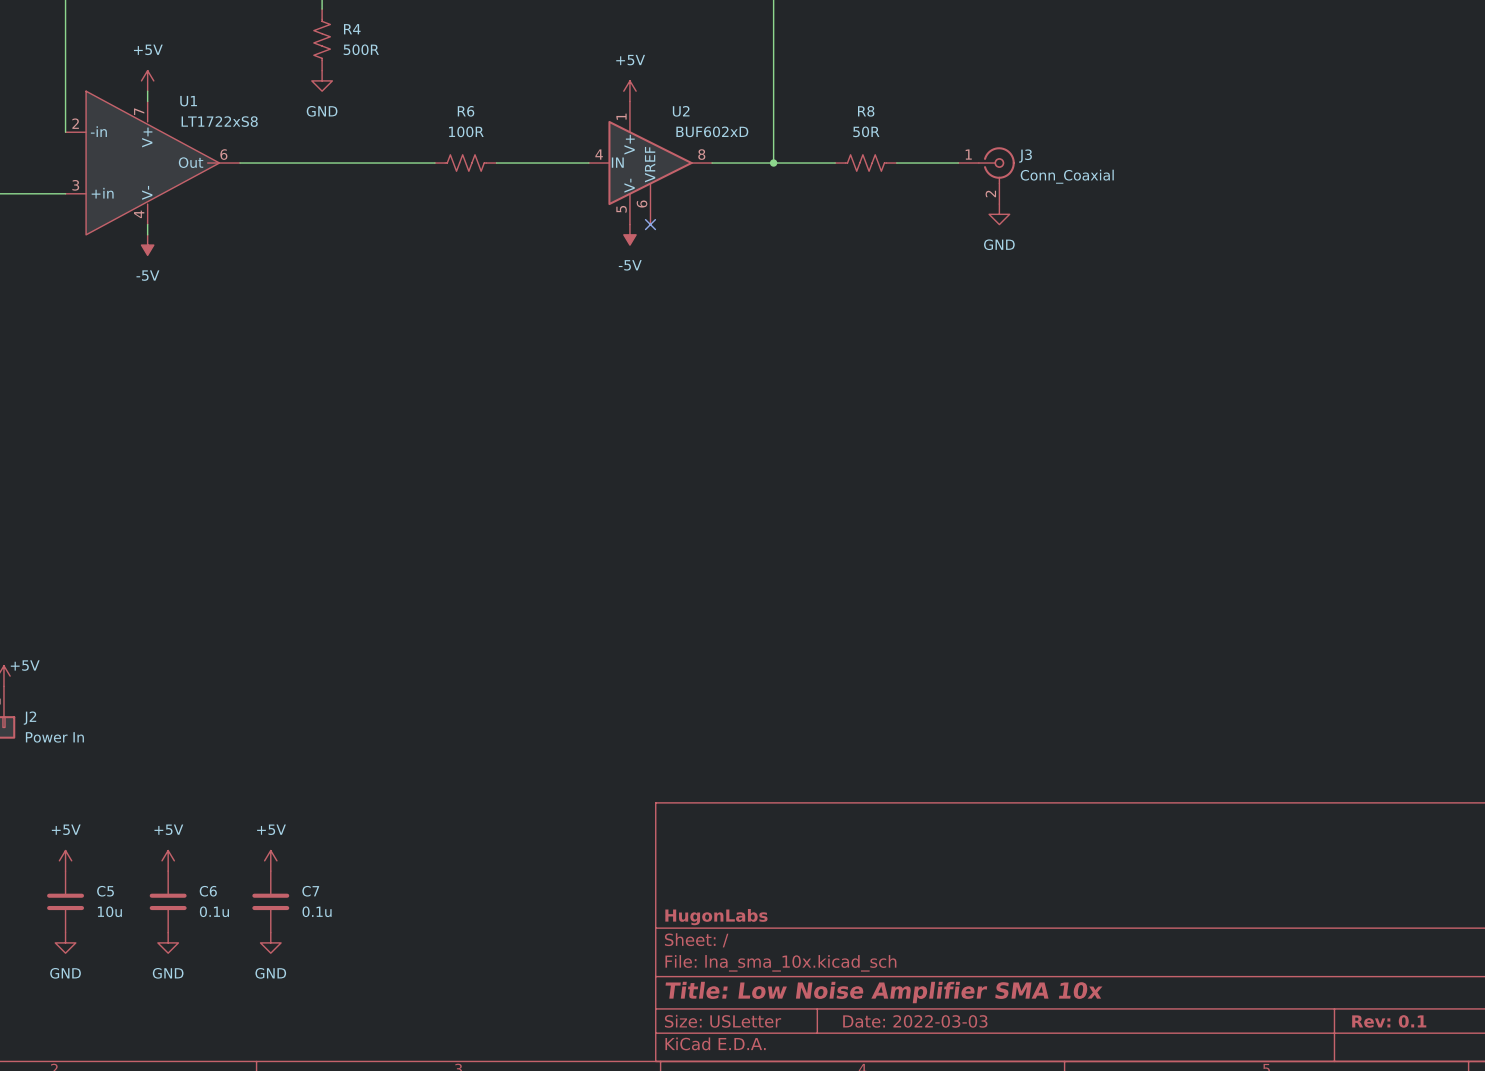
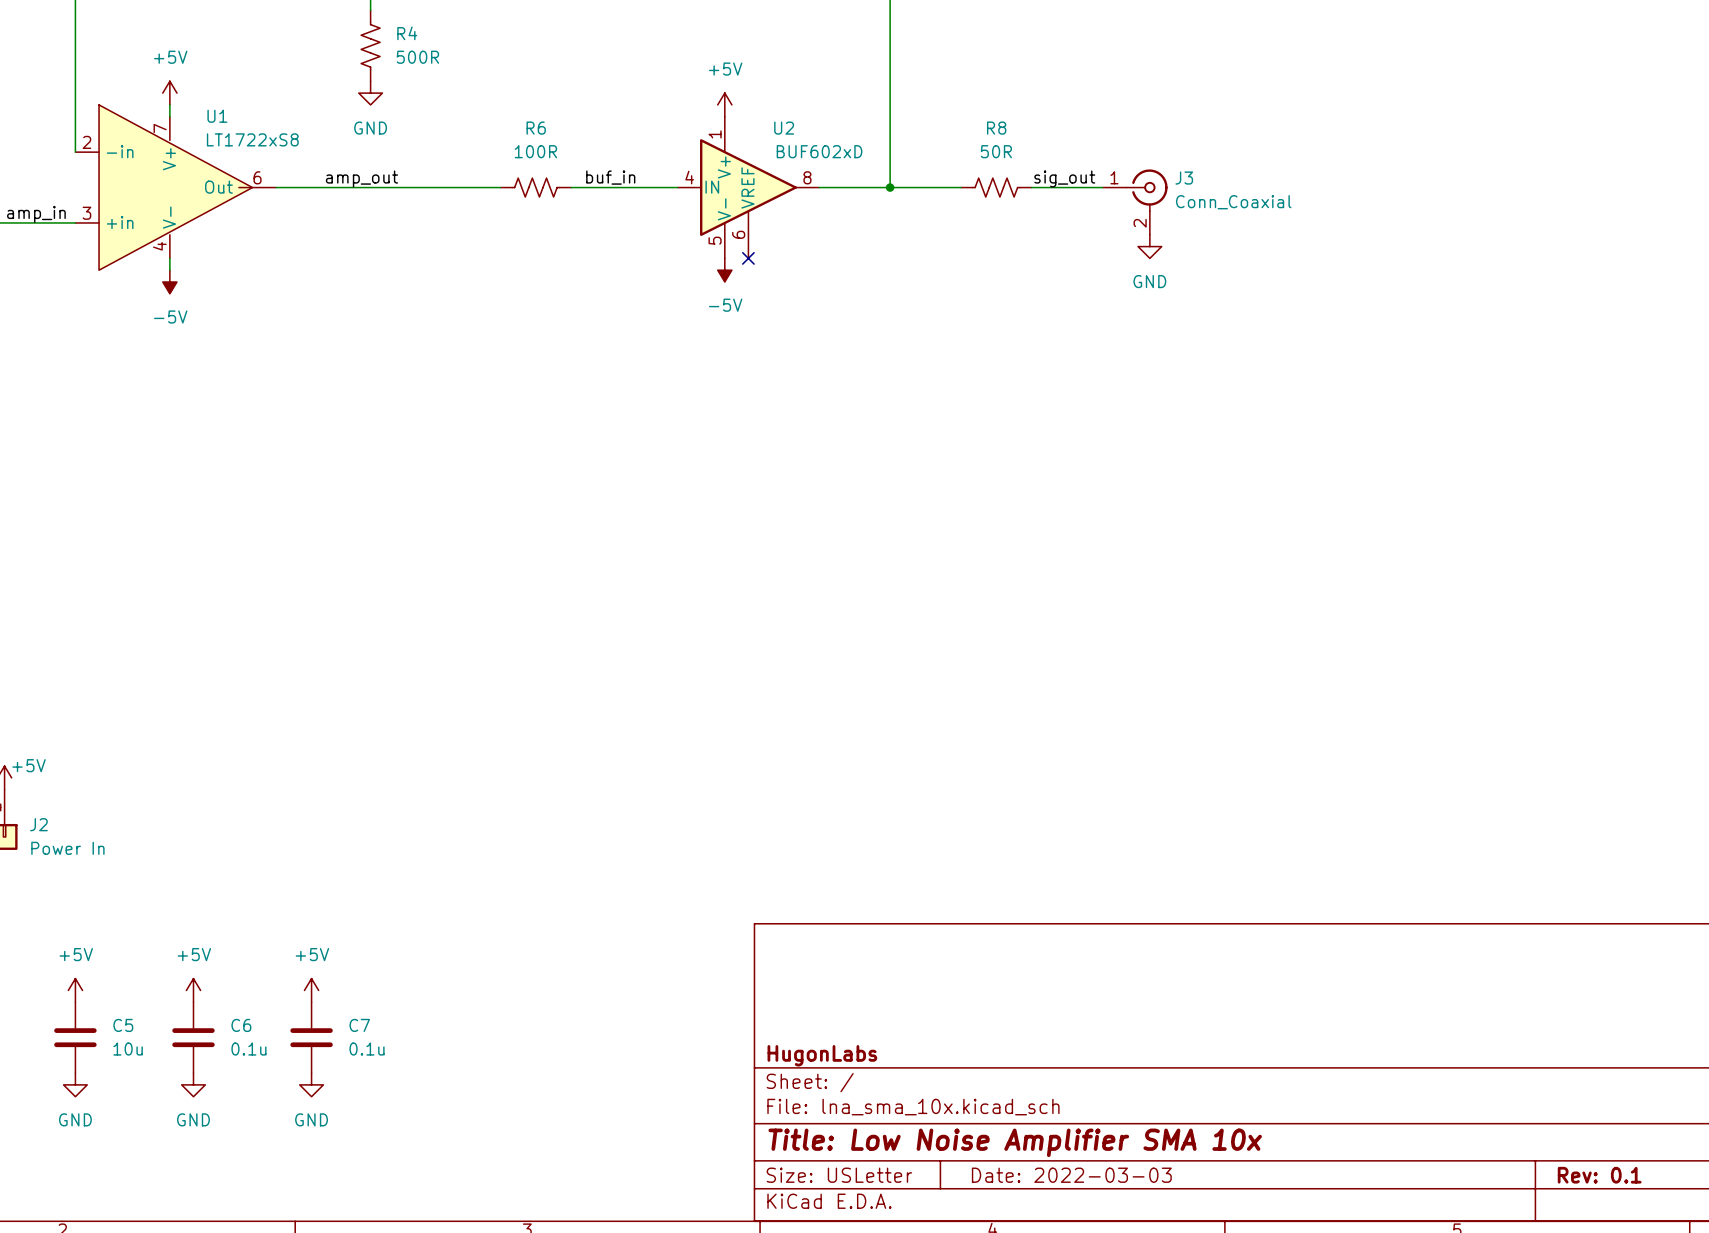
label: none -> amp_out (361, 178)
label: none -> buf_in (610, 177)
label: none -> sig_out (1064, 178)
label: none -> amp_in (36, 214)

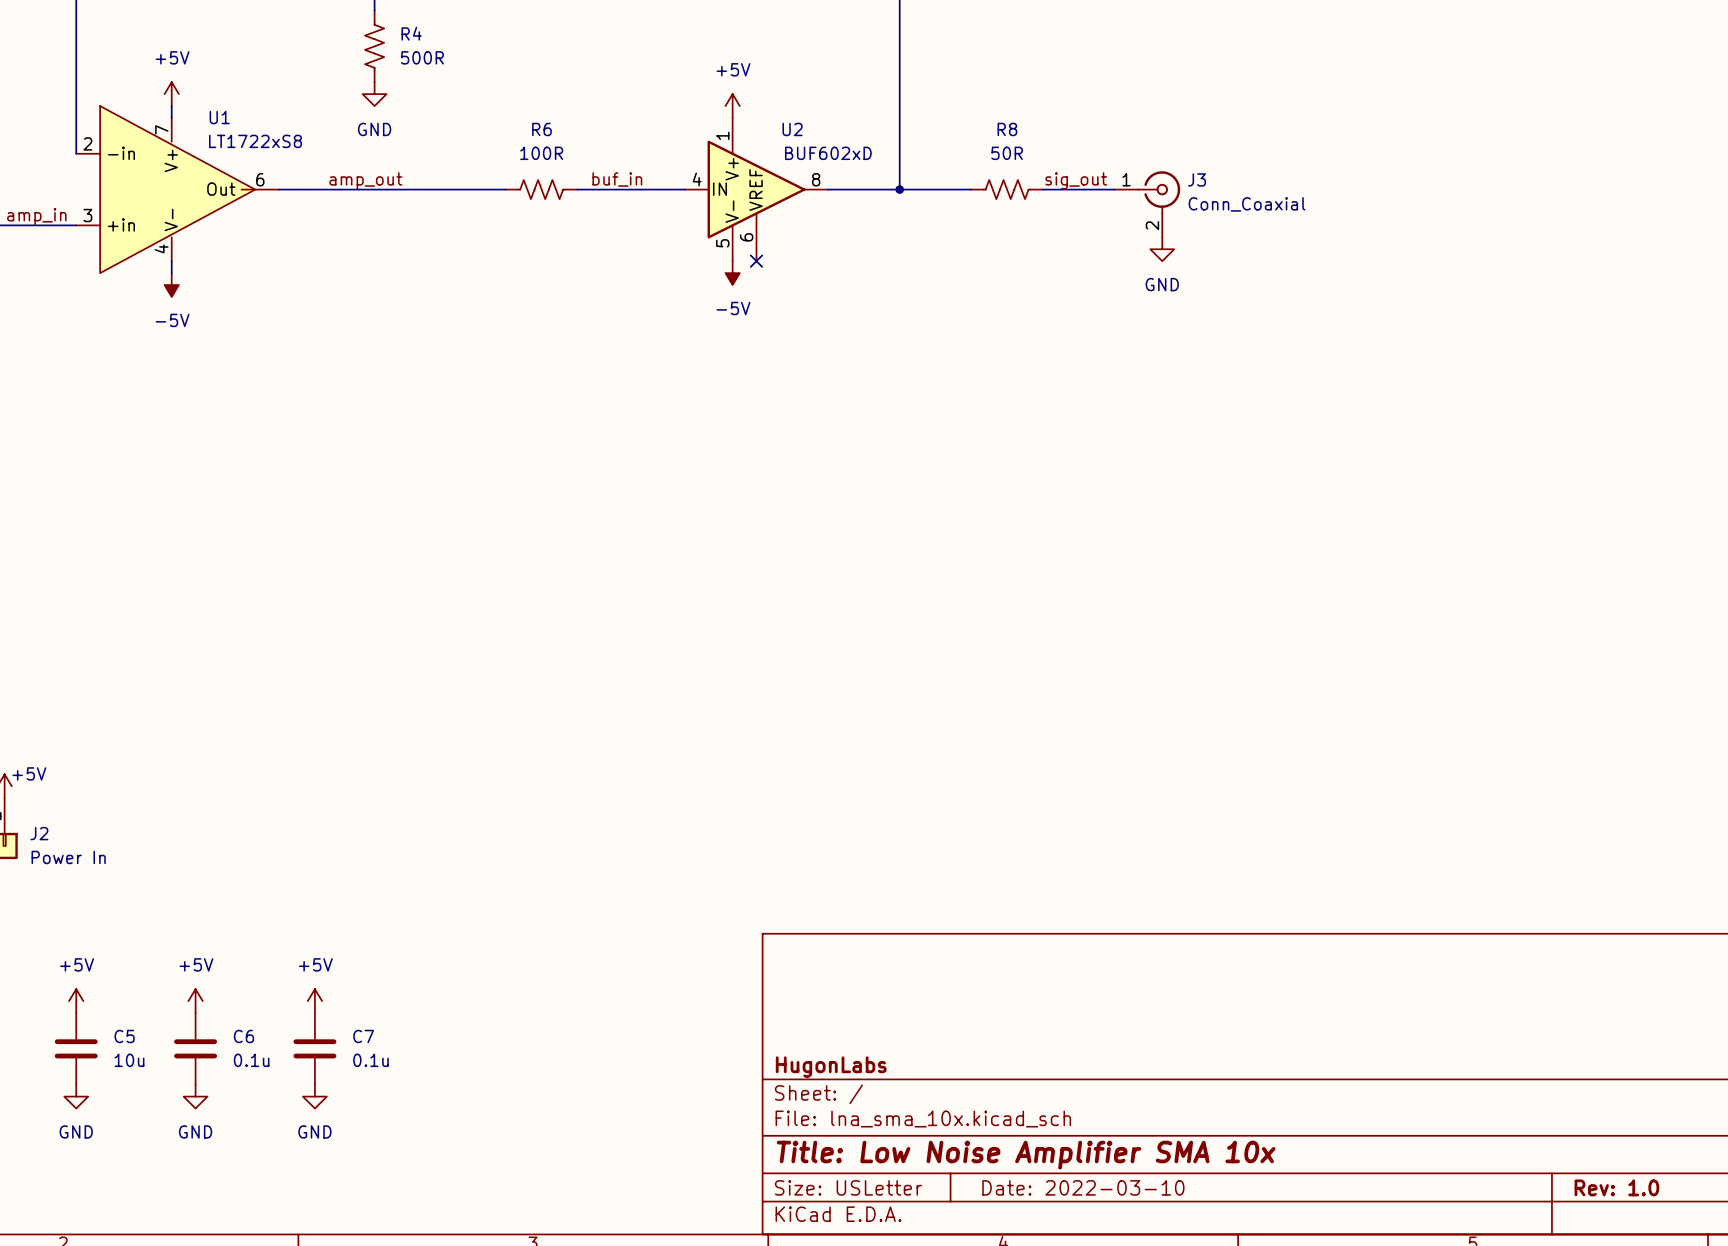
title block: Date: 2022-03-03 (1071, 1175) -> Date: 2022-03-10 (1083, 1187)
title block: Rev: 0.1 (1599, 1175) -> Rev: 1.0 (1616, 1187)

